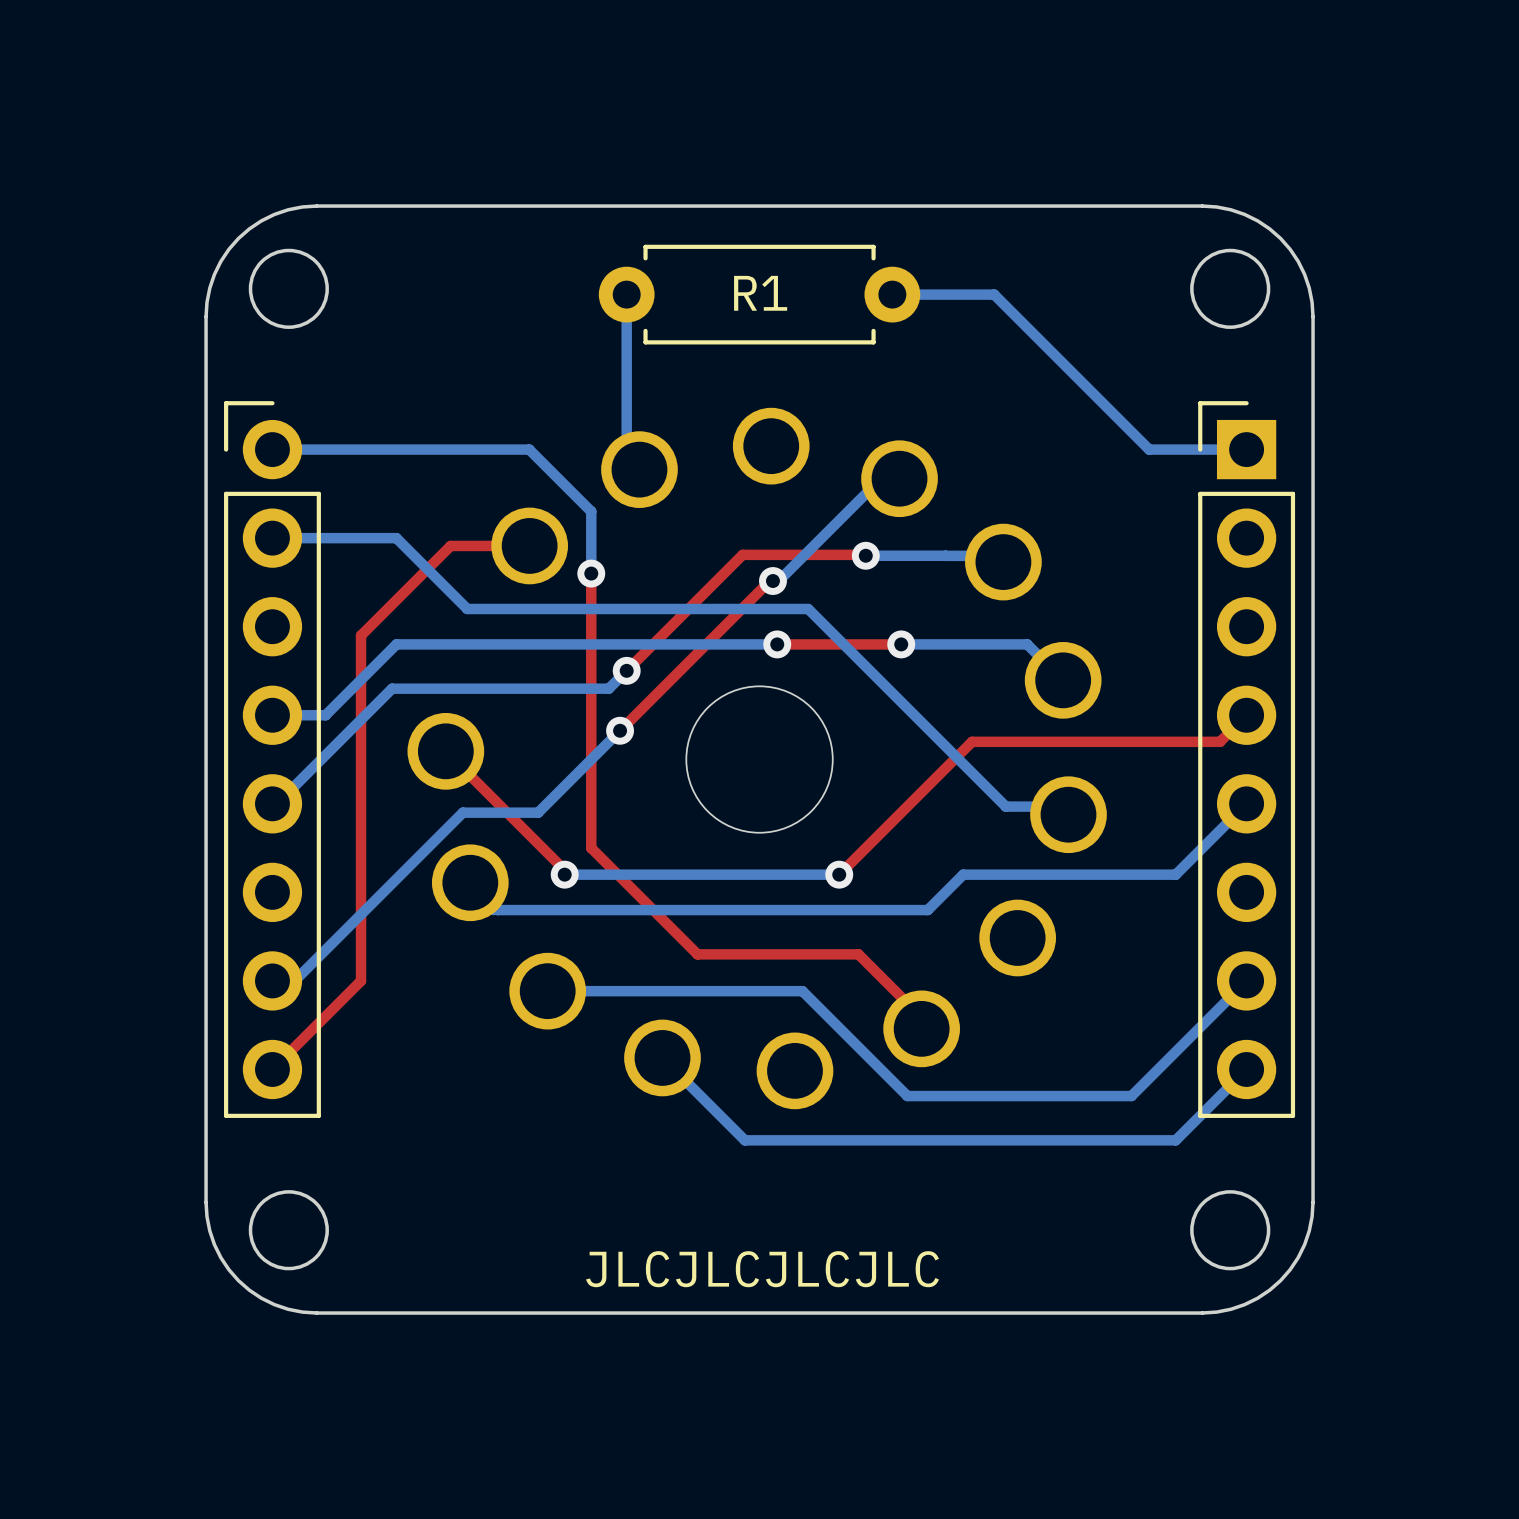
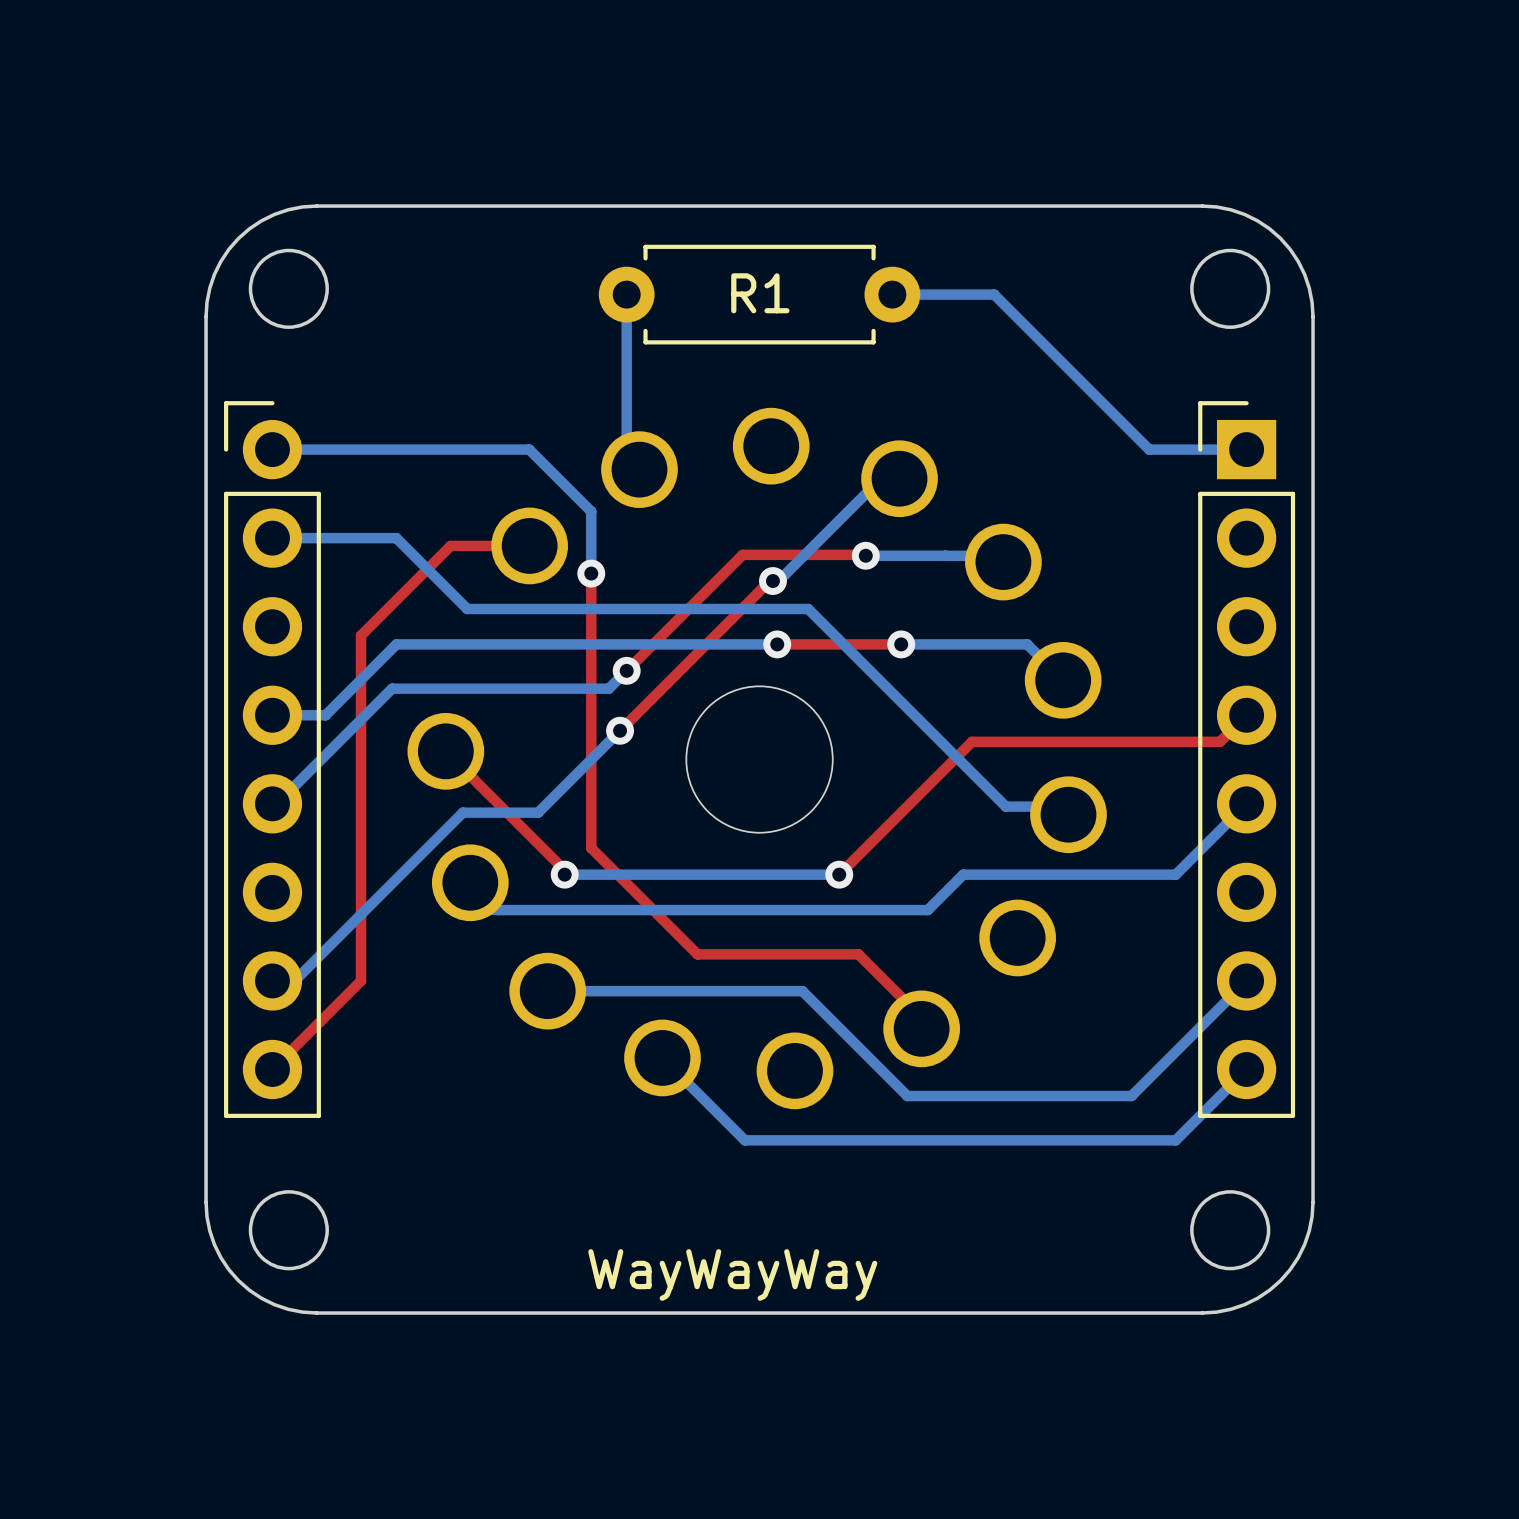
text: JLCJLCJLCJLC (762, 1269) -> WayWayWay (732, 1275)

